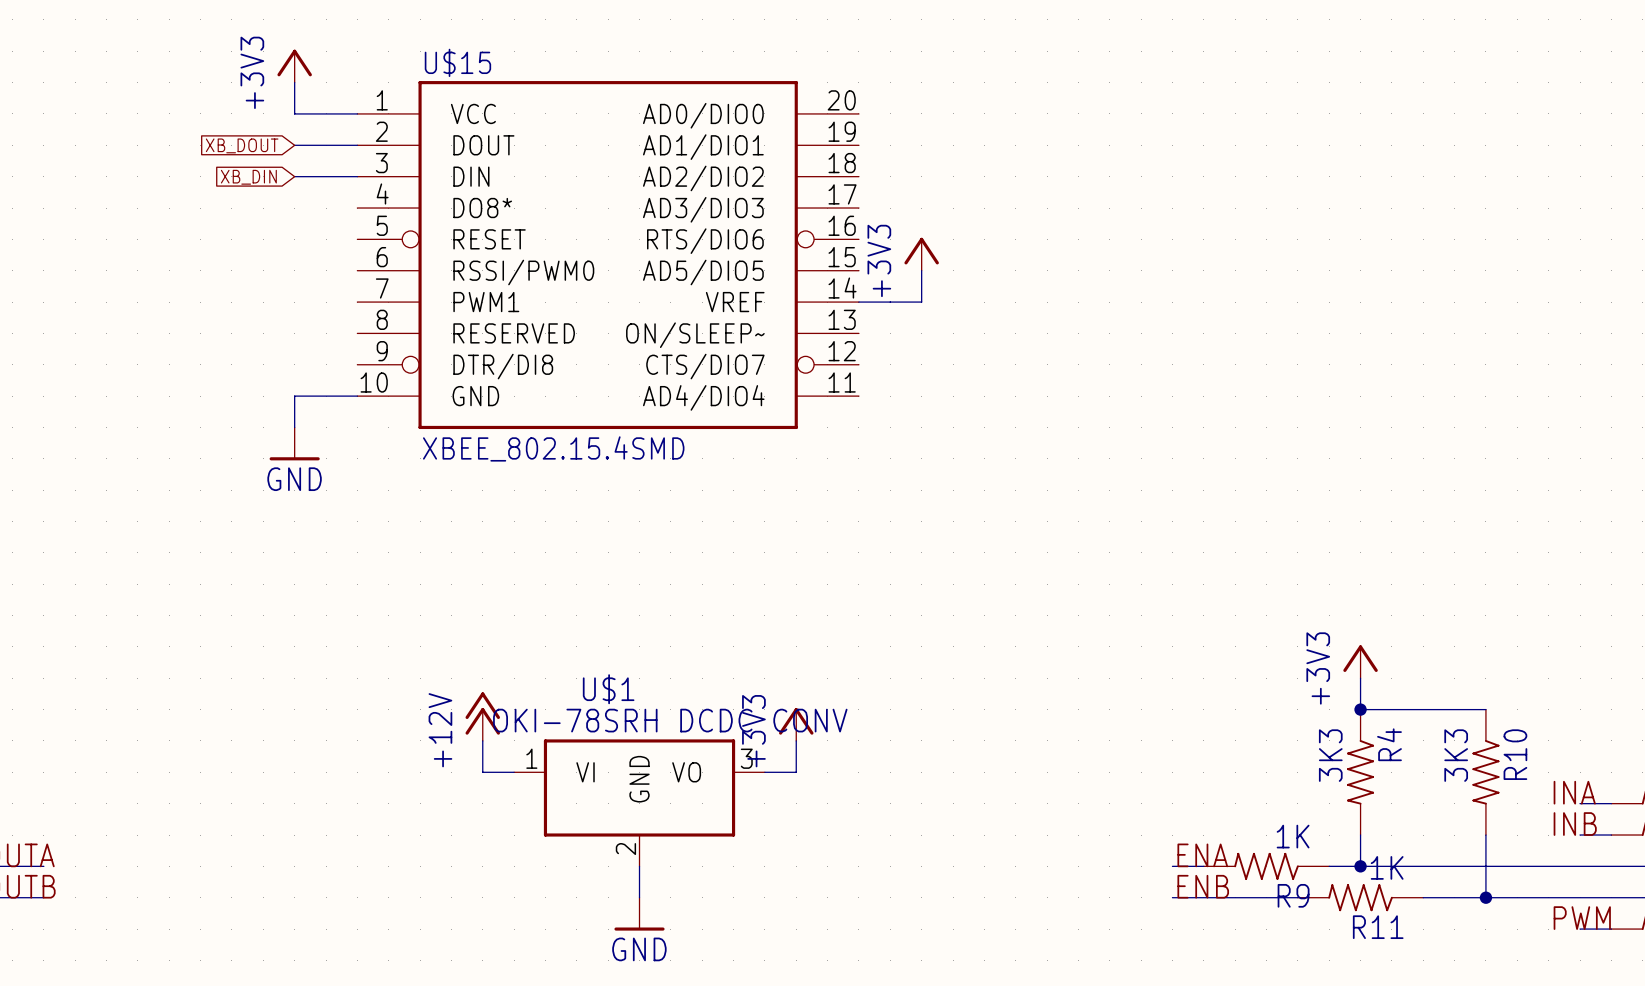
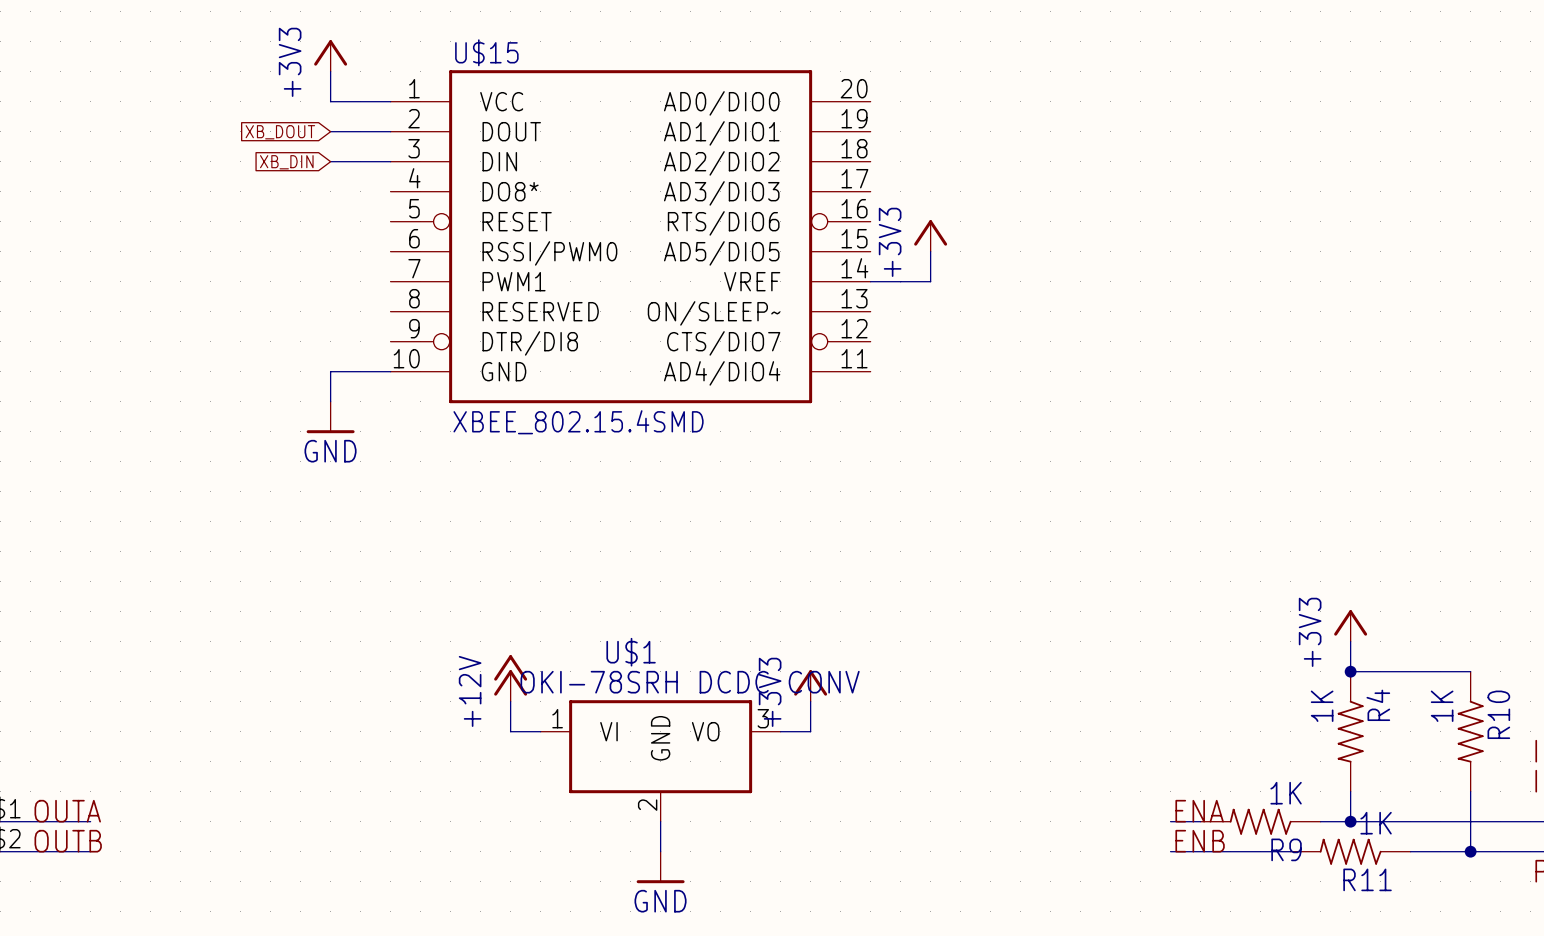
R4 value: 3K3 (1330, 755) -> 1K (1322, 706)
R10 value: 3K3 (1456, 755) -> 1K (1442, 706)

